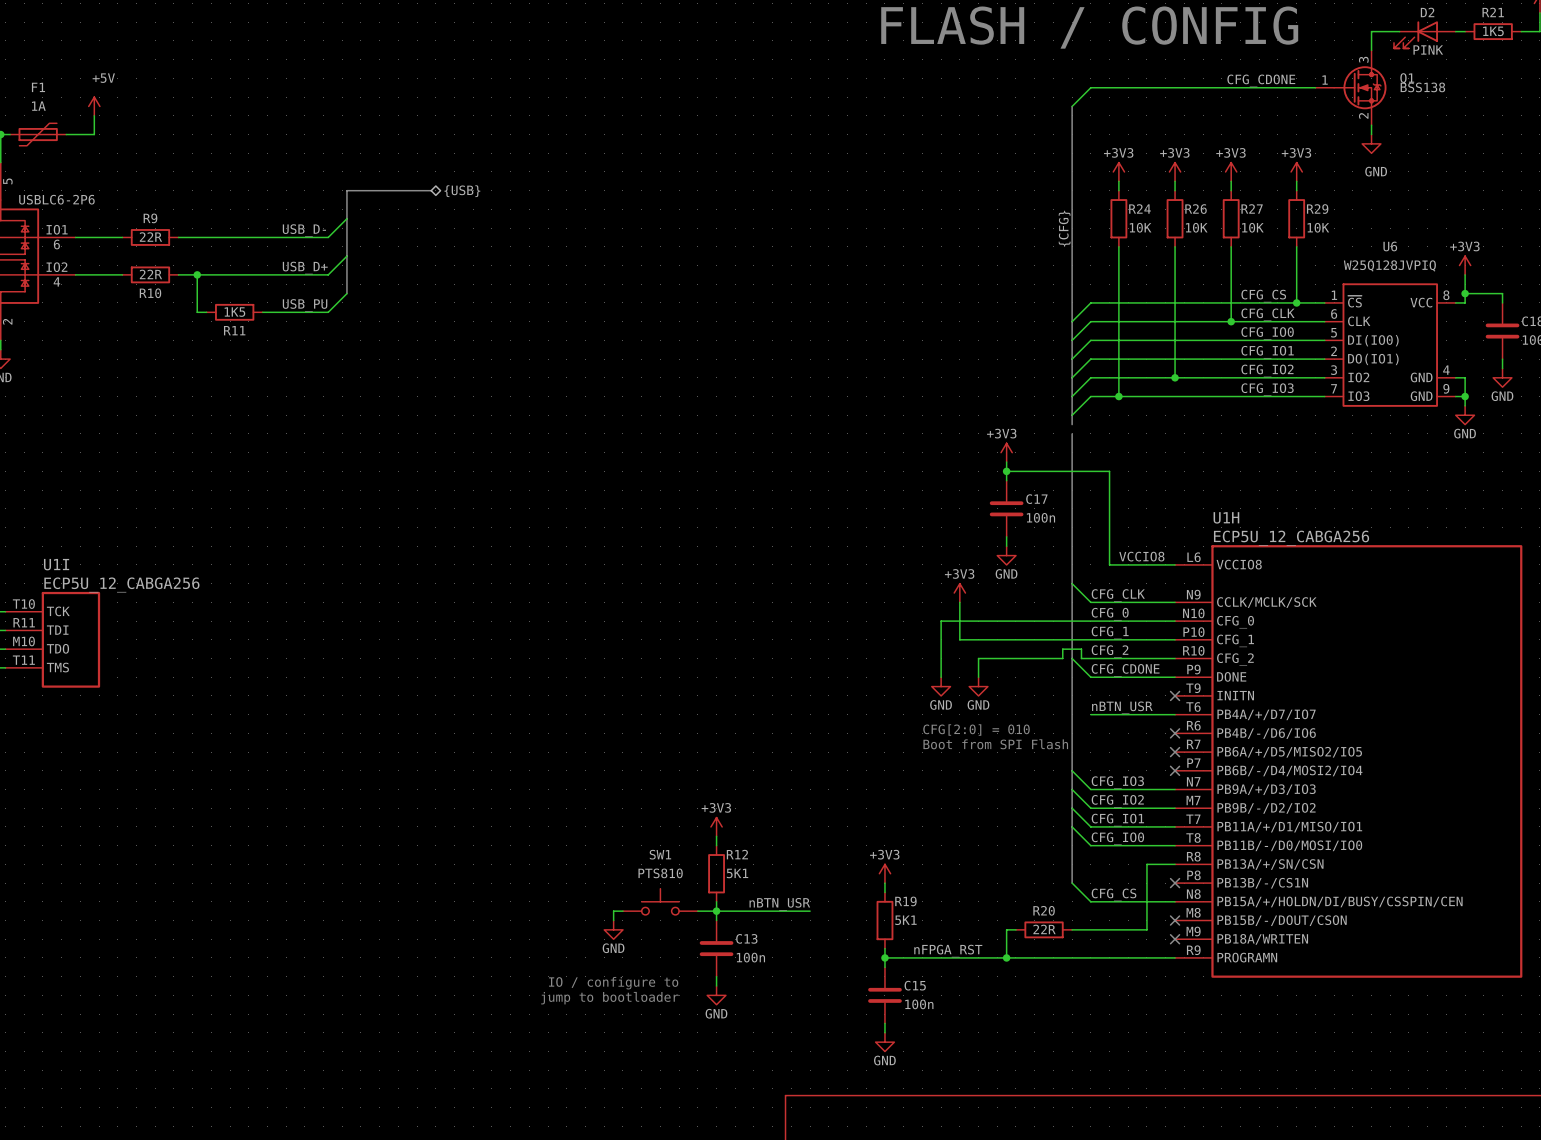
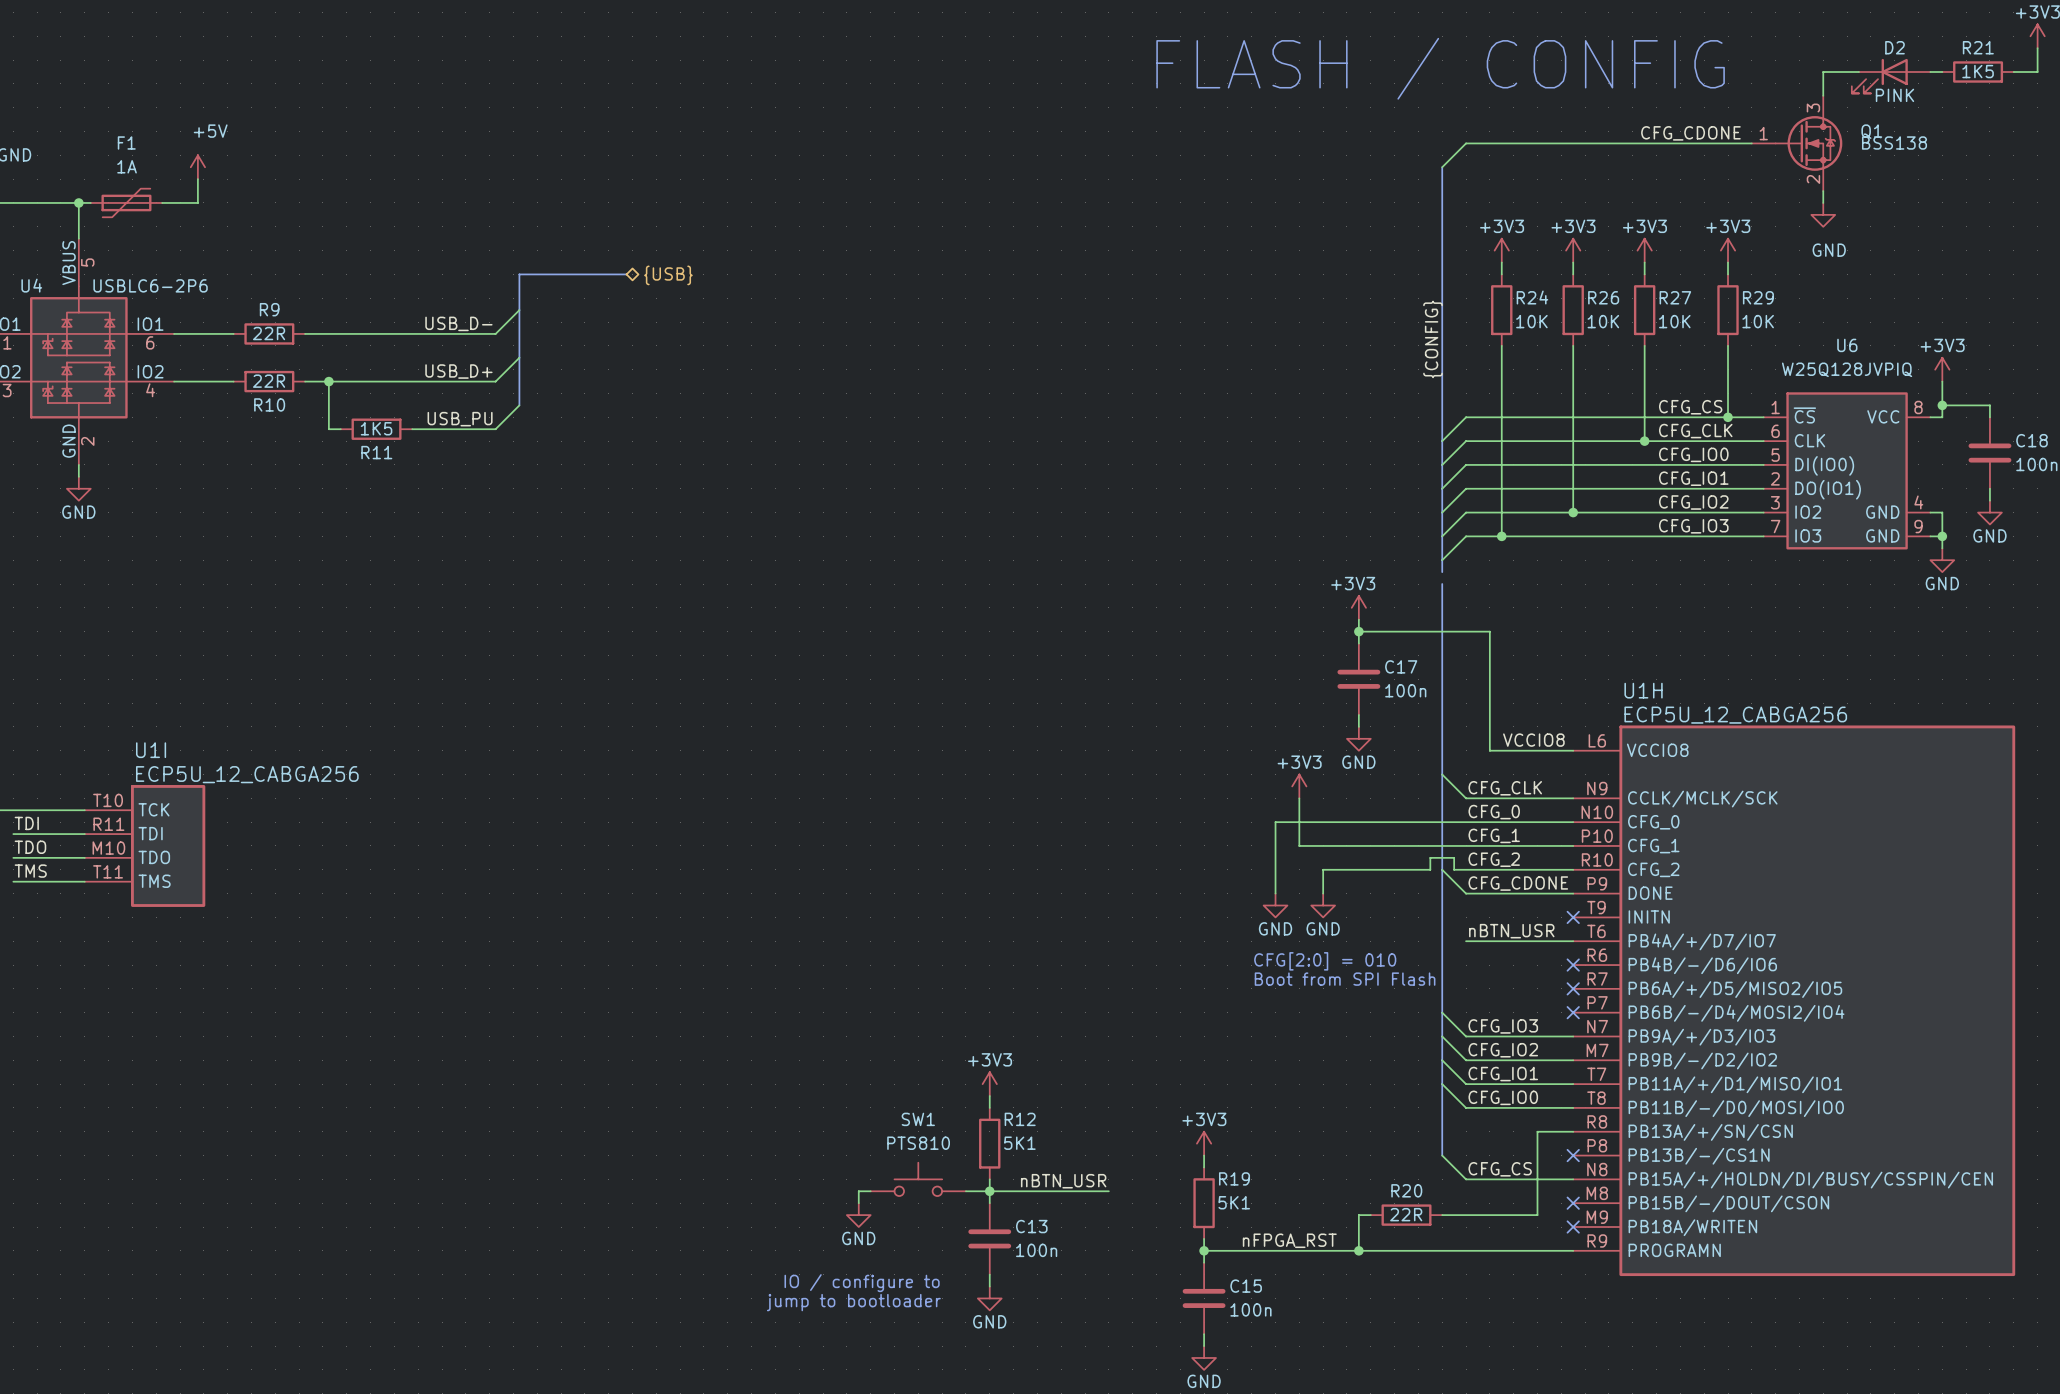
label: {CFG} (1064, 228) -> {CONFIG} (1433, 339)

